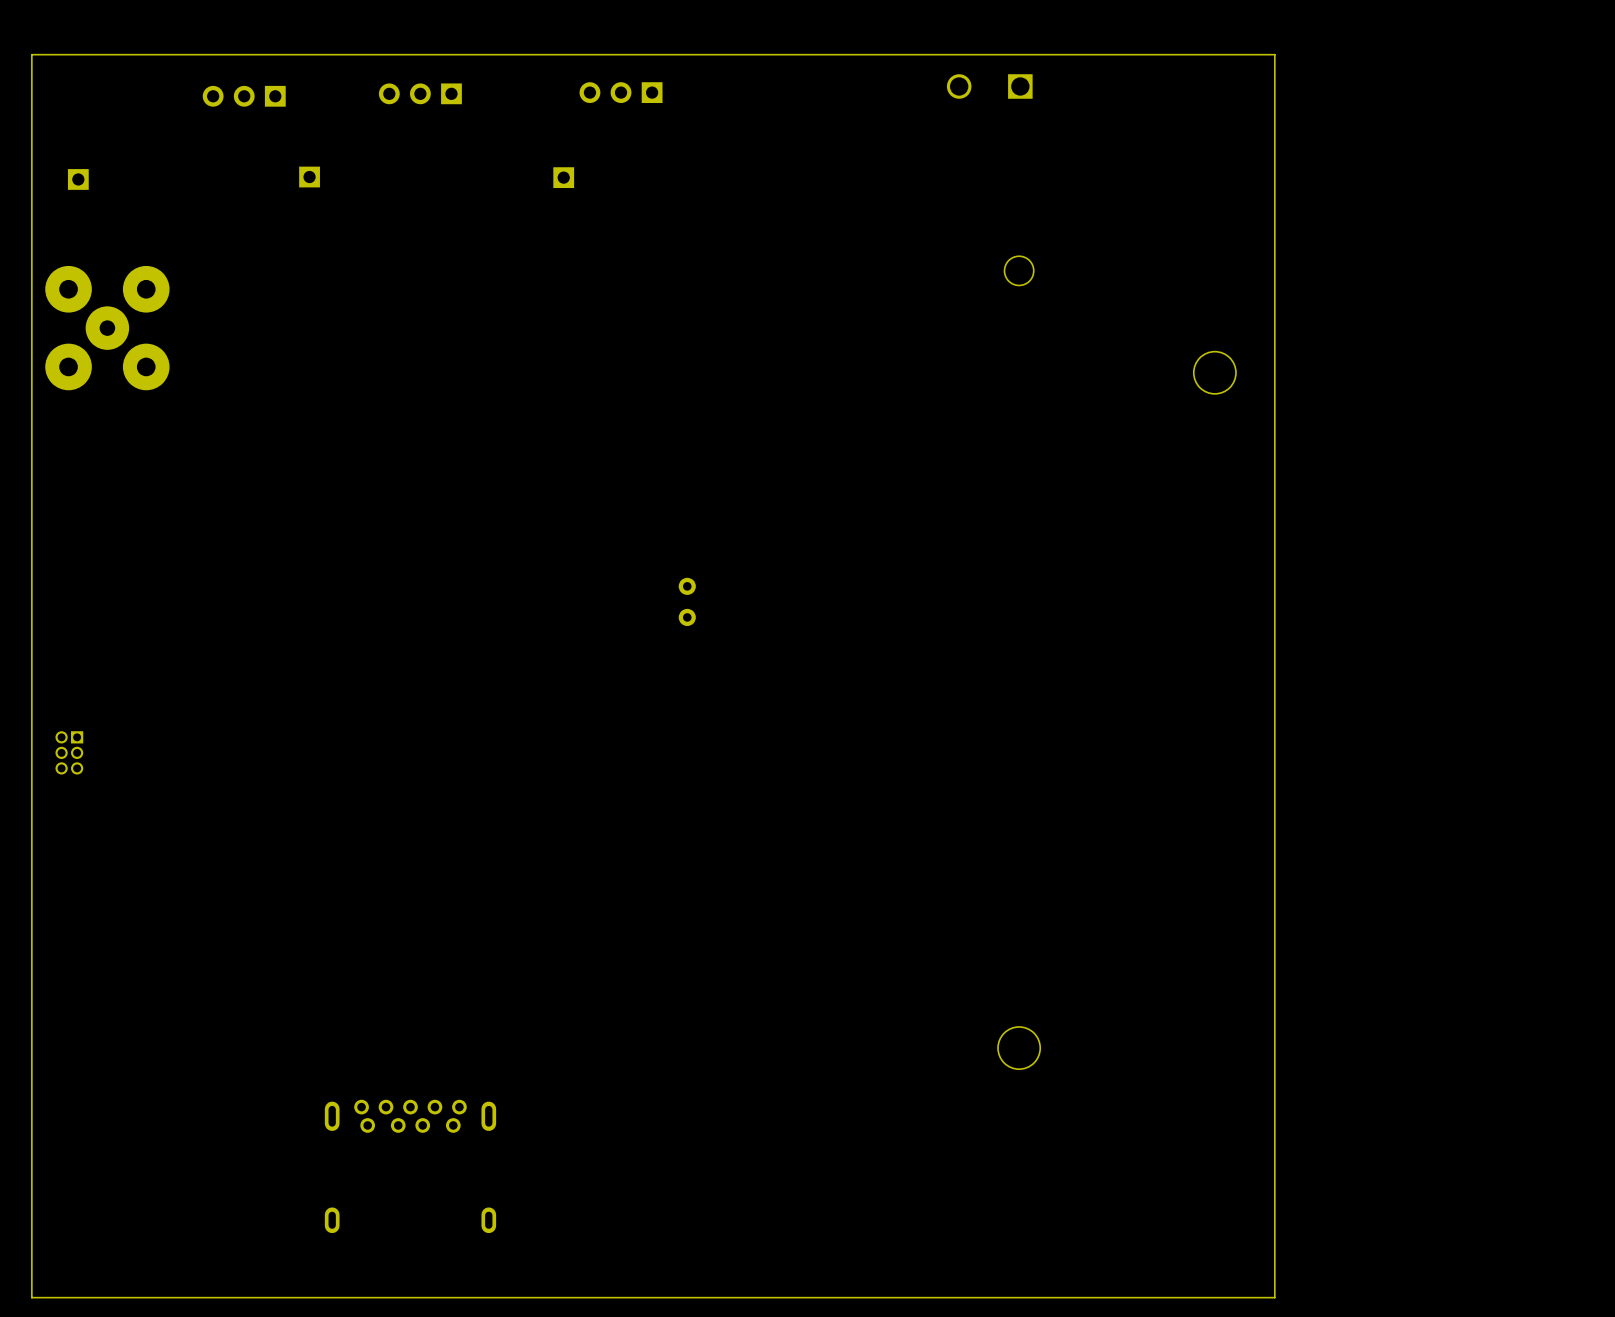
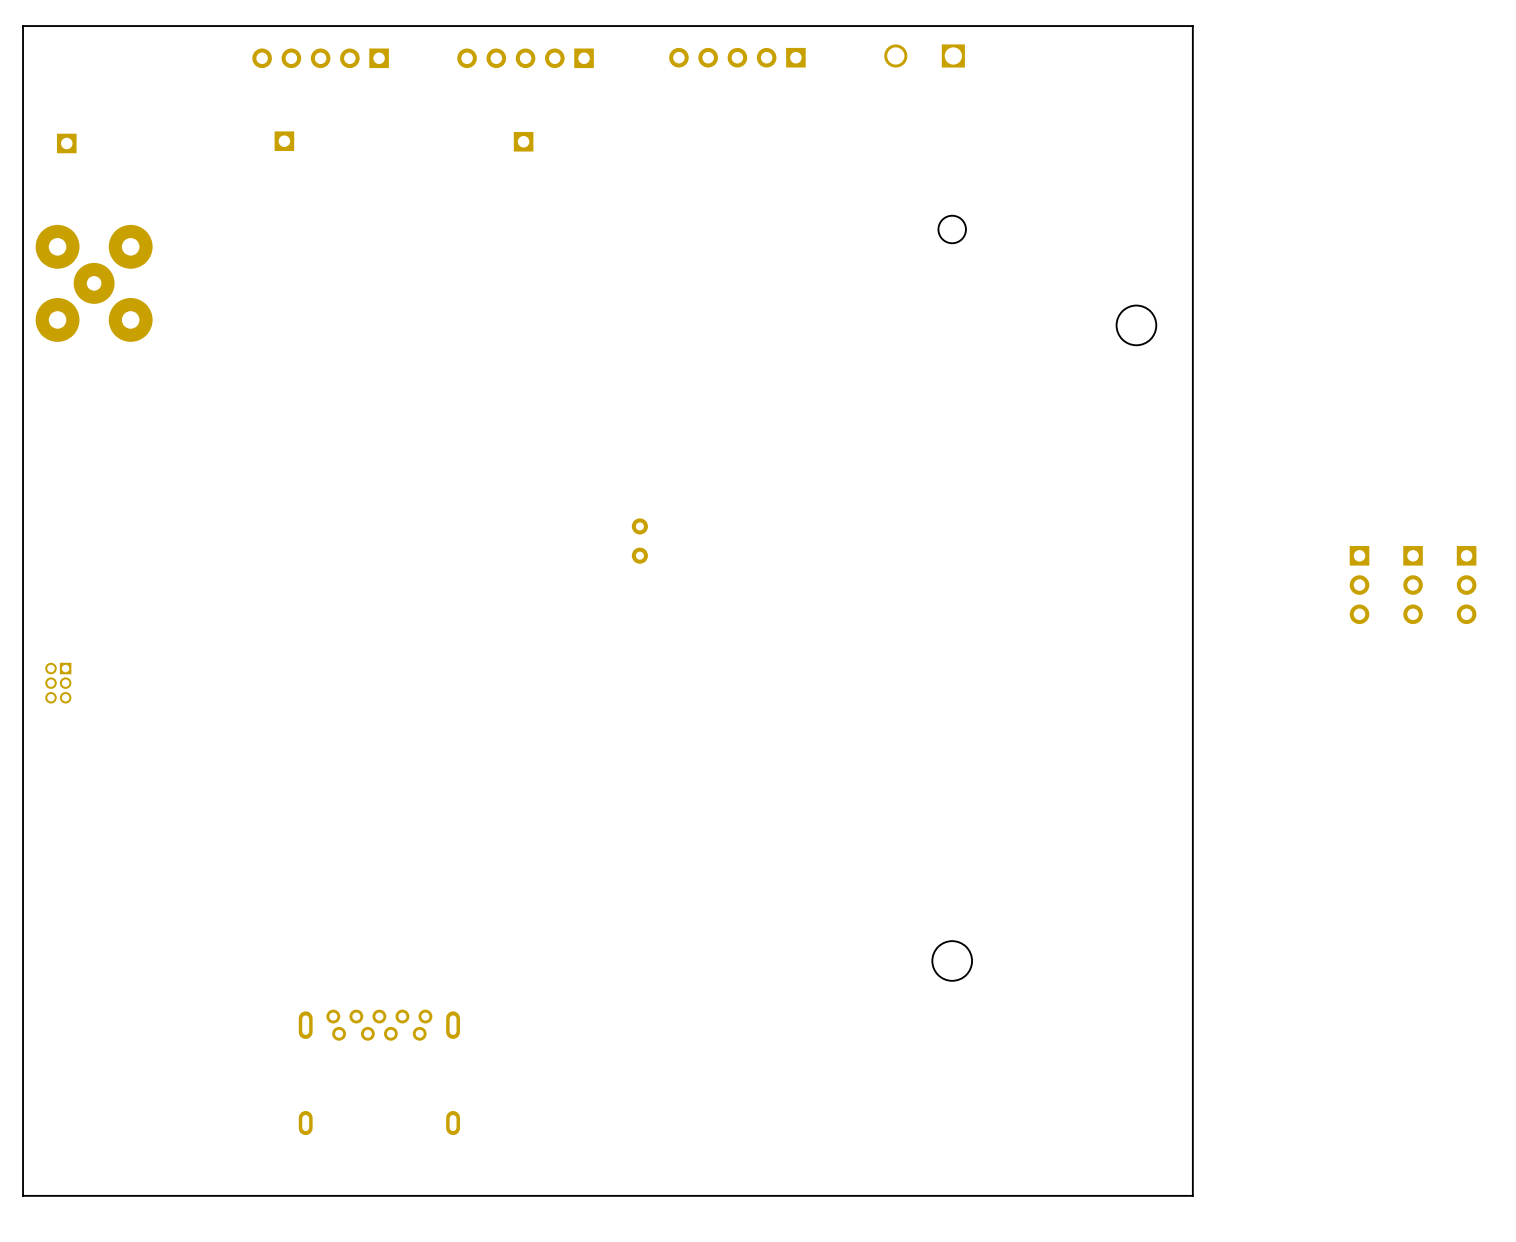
part: none -> (320, 58)
part: none -> (525, 58)
part: none -> (737, 57)
part: (621, 92) -> none
part: (420, 93) -> none
part: (244, 96) -> none
part: none -> (1359, 585)
part: none -> (1413, 585)
part: none -> (1466, 585)

